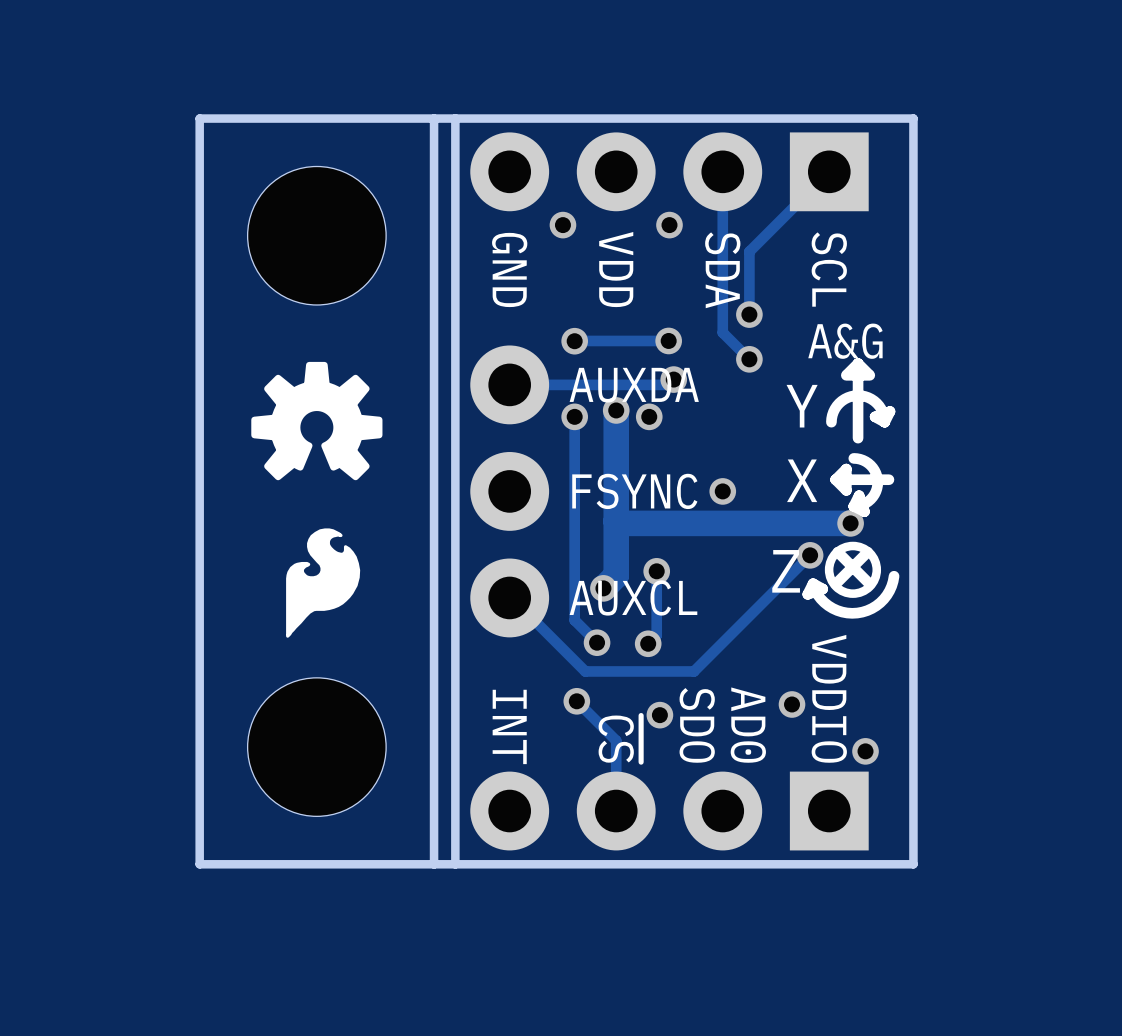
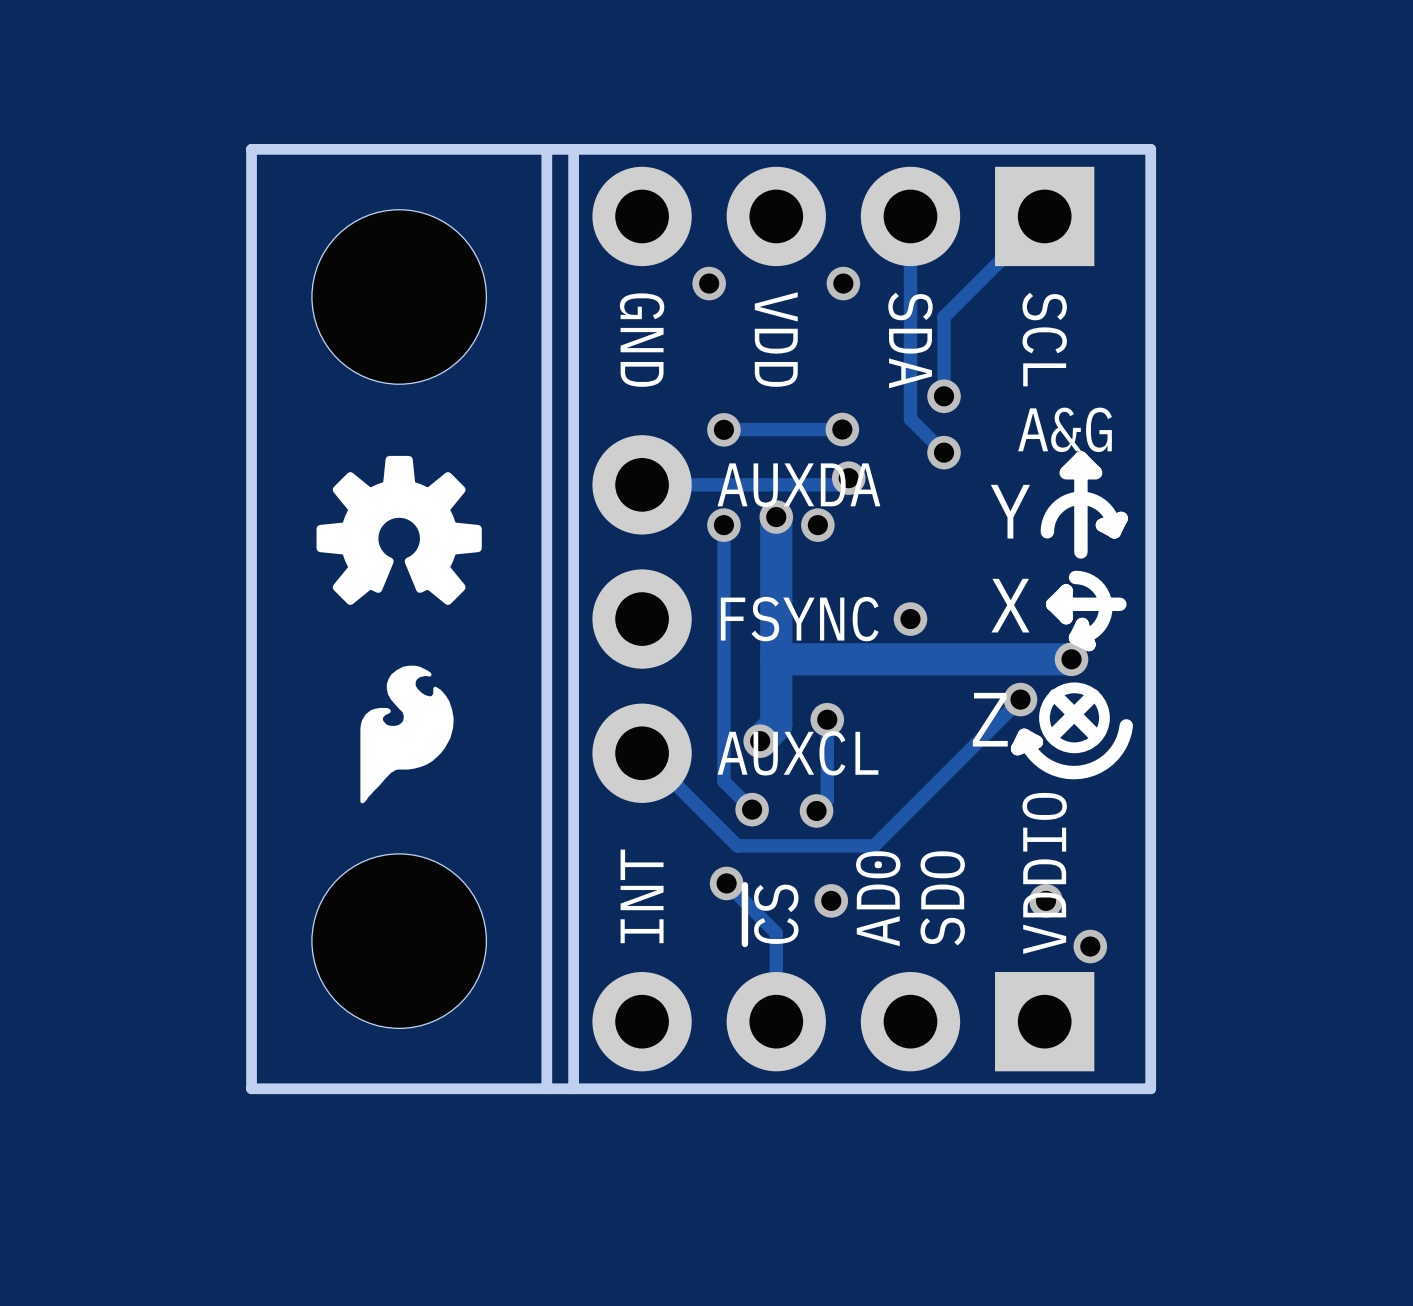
text rotation: 0° (829, 698) -> 180° (1044, 873)
via position: (792, 704) -> (1046, 900)
text rotation: 0° (697, 725) -> 180° (942, 898)
text rotation: 0° (748, 725) -> 180° (878, 898)
text rotation: 0° (509, 726) -> 180° (642, 896)
text rotation: 0° (619, 739) -> 180° (771, 914)

